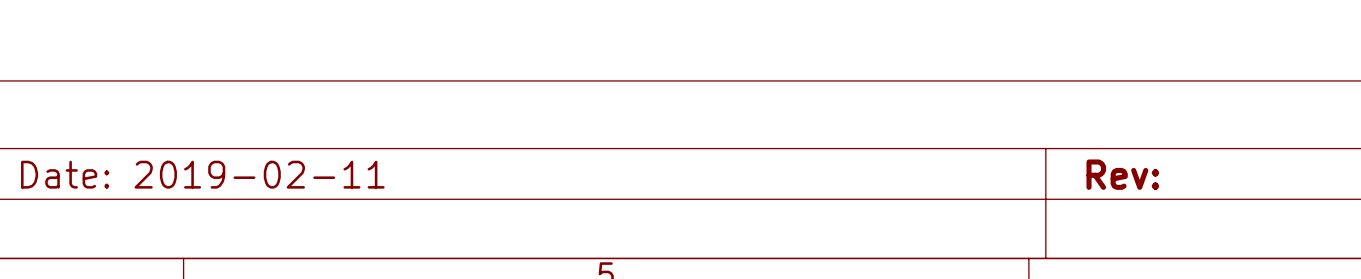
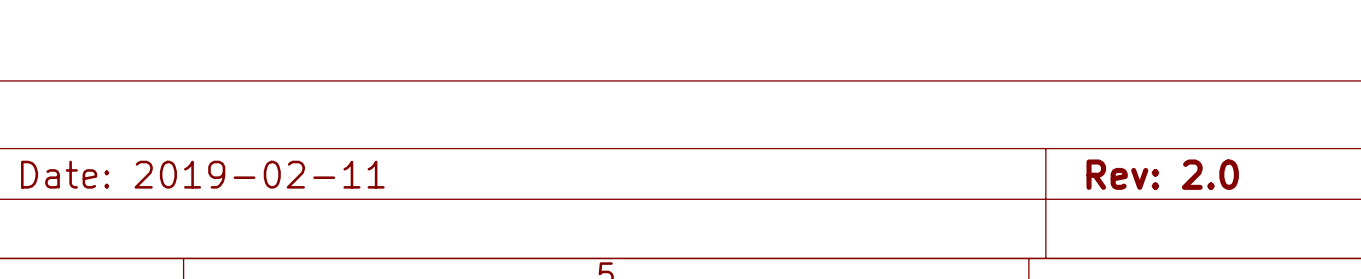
title block: Rev: (1122, 174) -> Rev: 2.0 (1162, 174)

